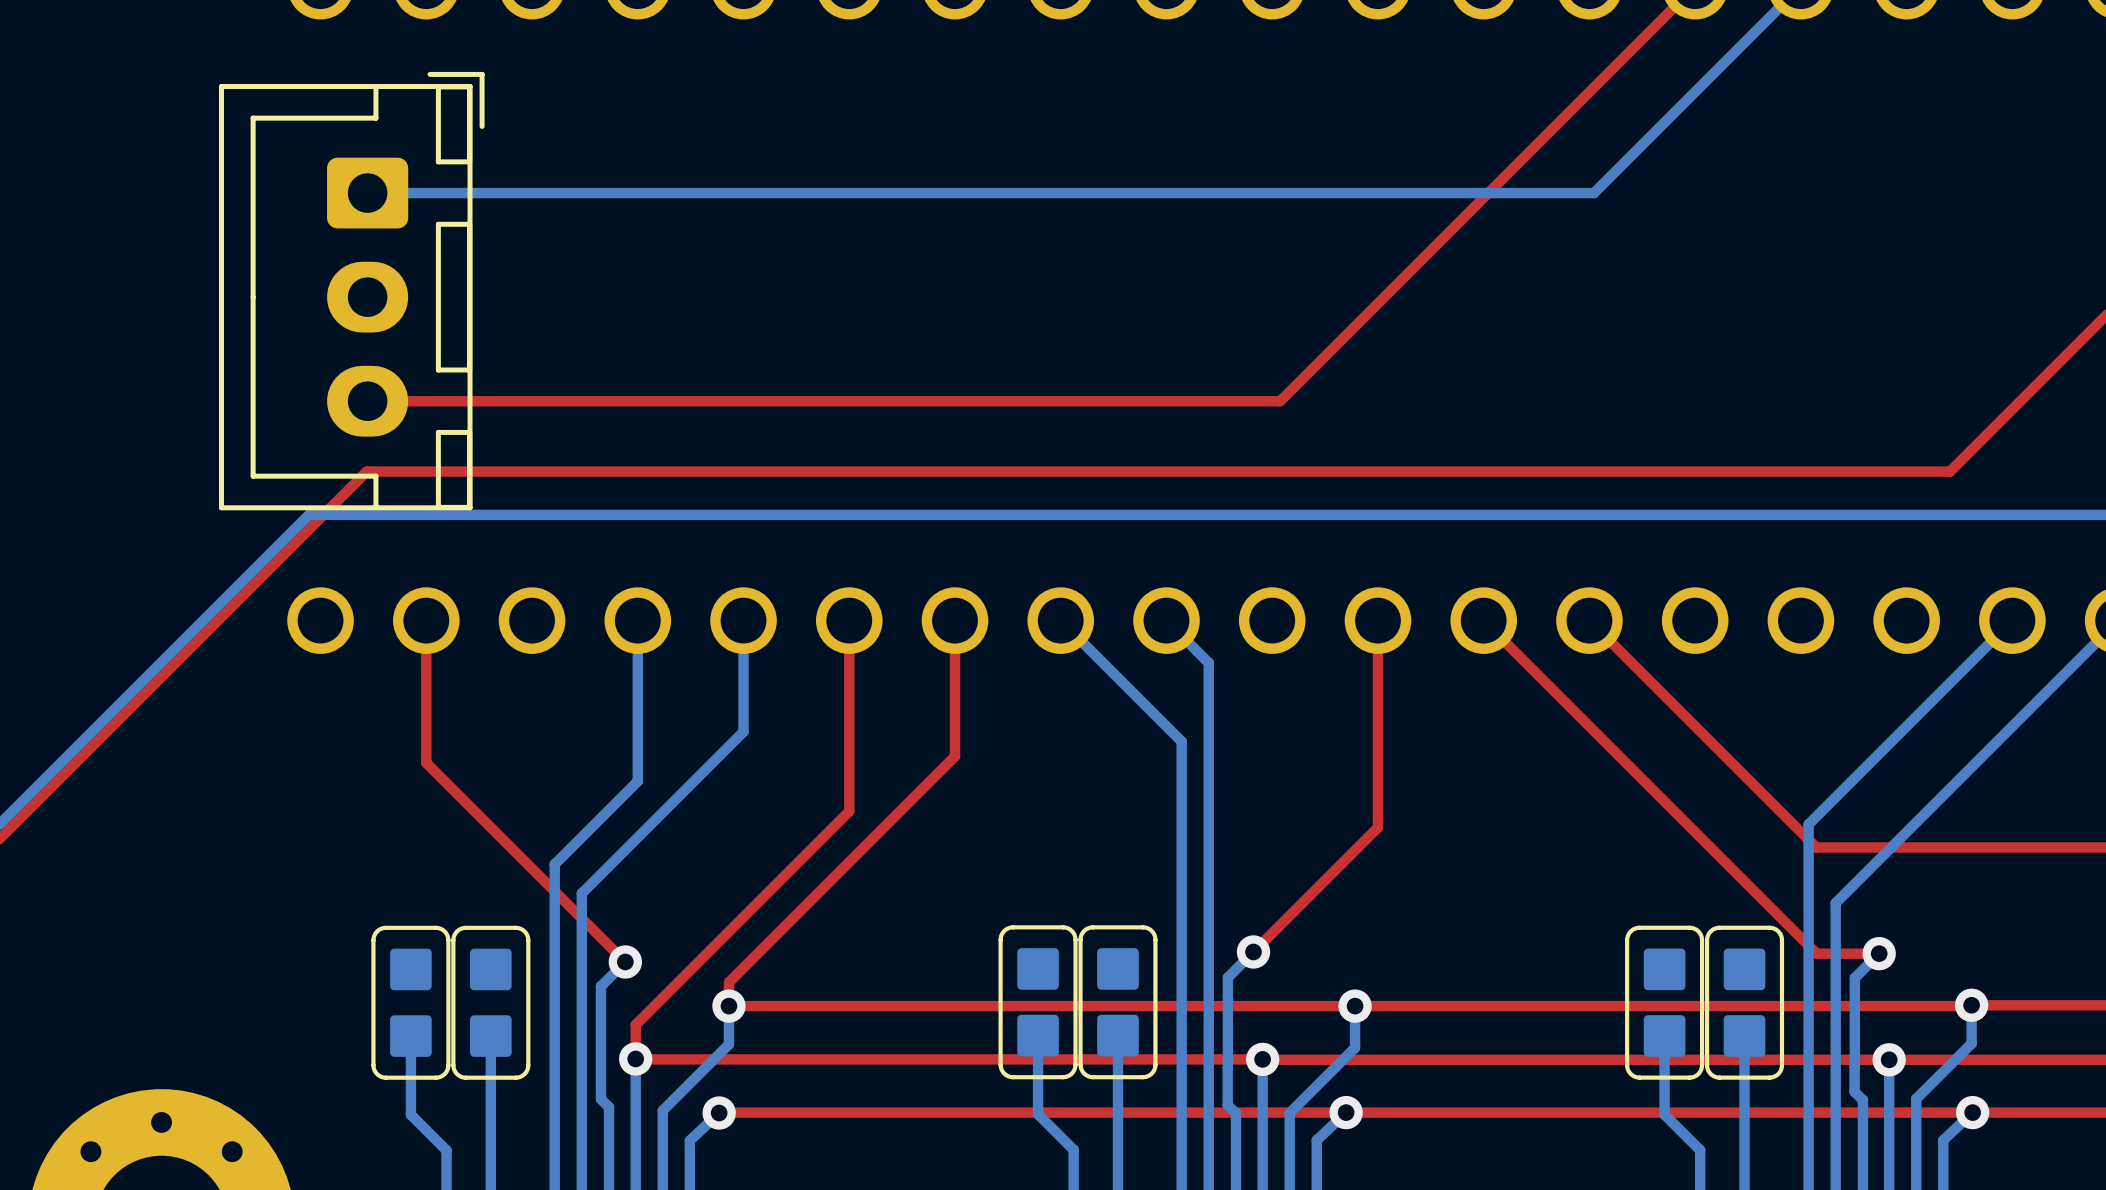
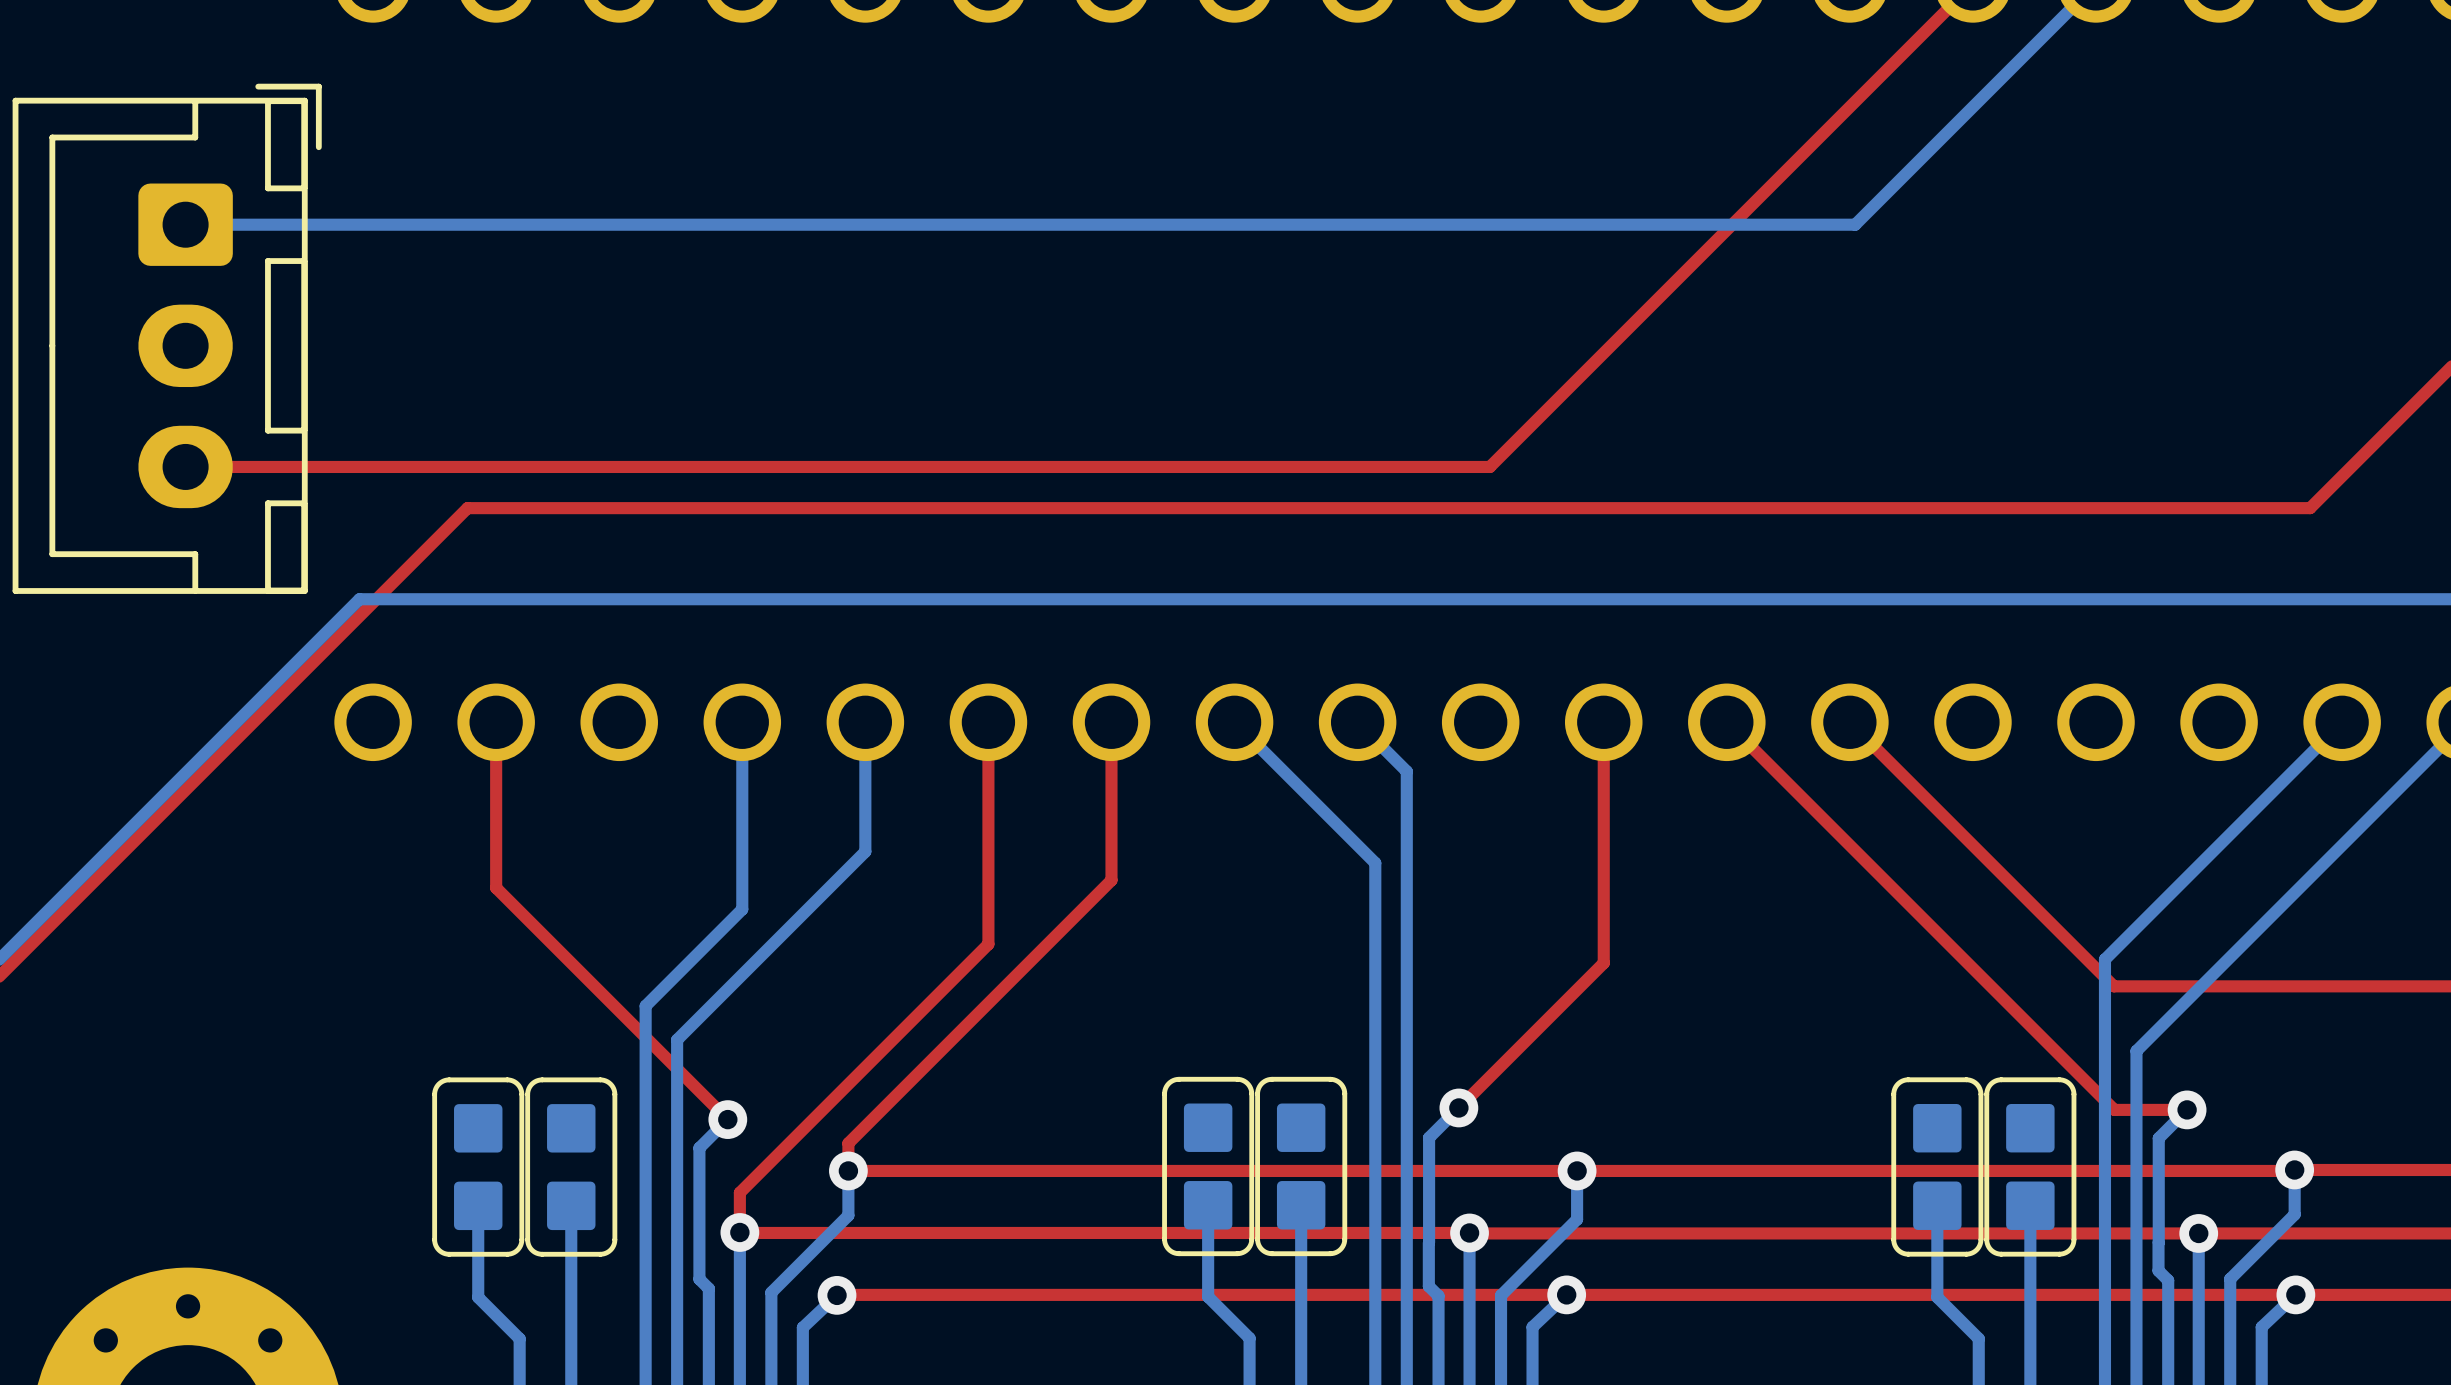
bottom track: none -> (427, 224) (185, 224)
part position: (351, 291) -> (167, 338)
top track: none -> (427, 466) (185, 466)
top track: (1984, 436) (1949, 471) (366, 471) -> (2310, 508) (467, 508) (426, 548)

